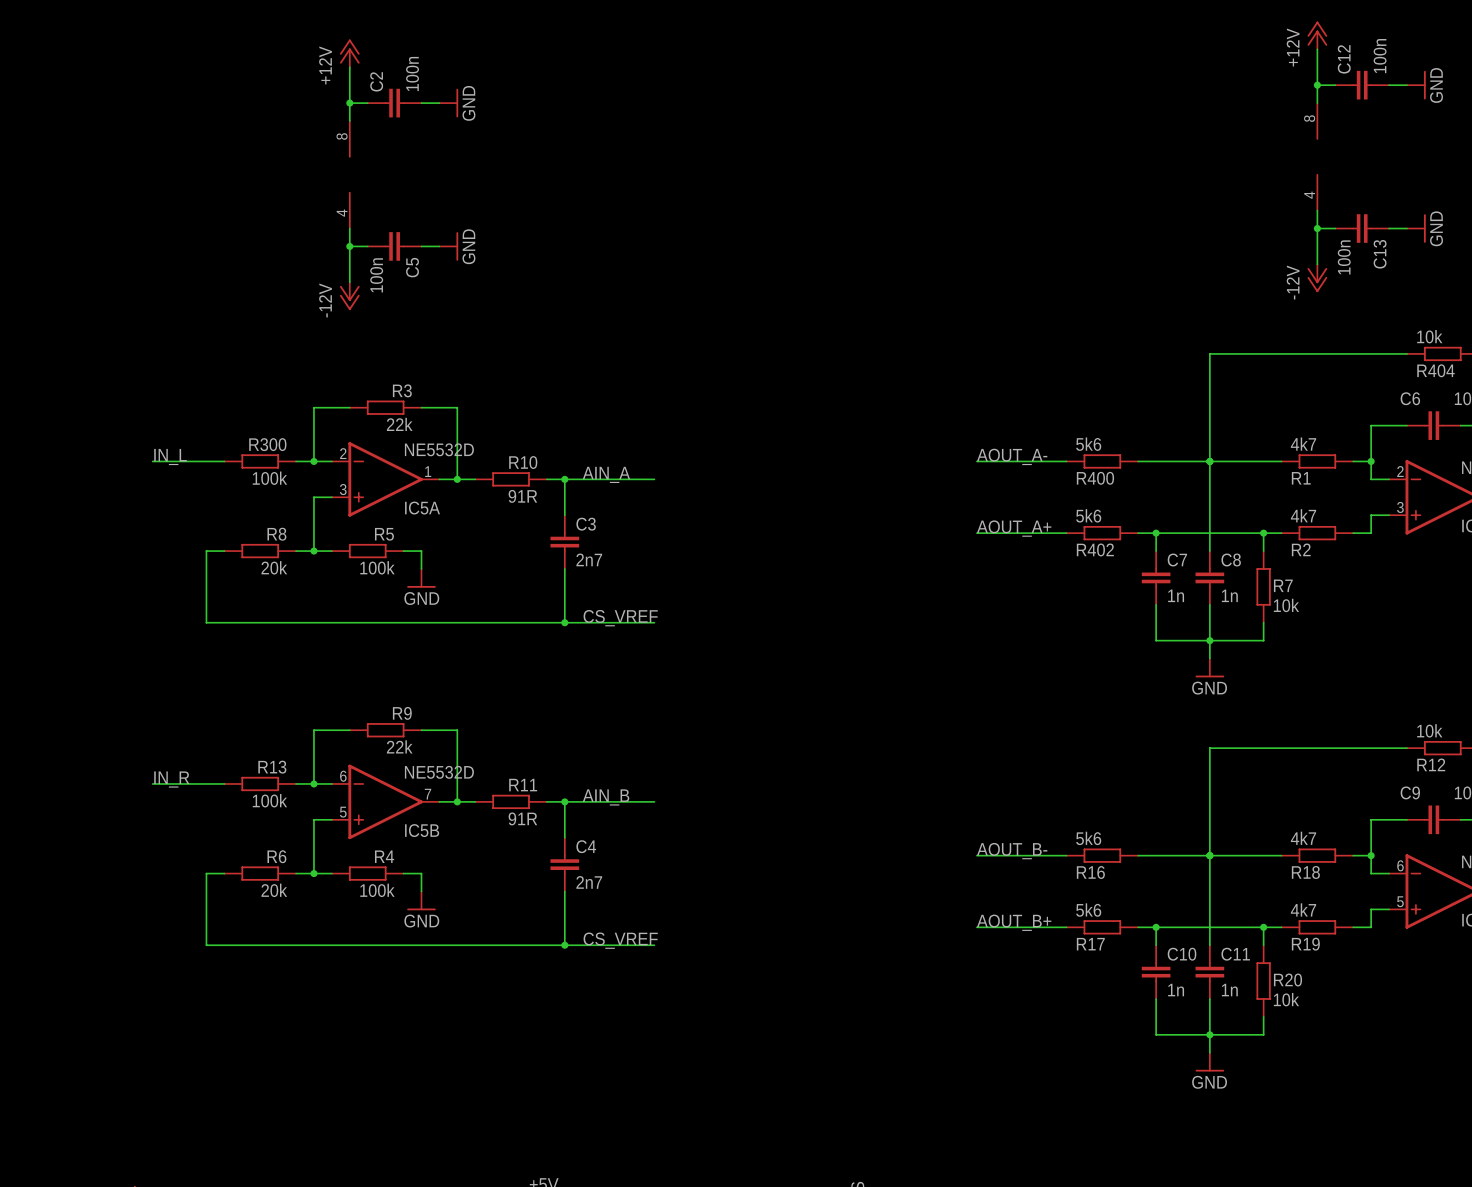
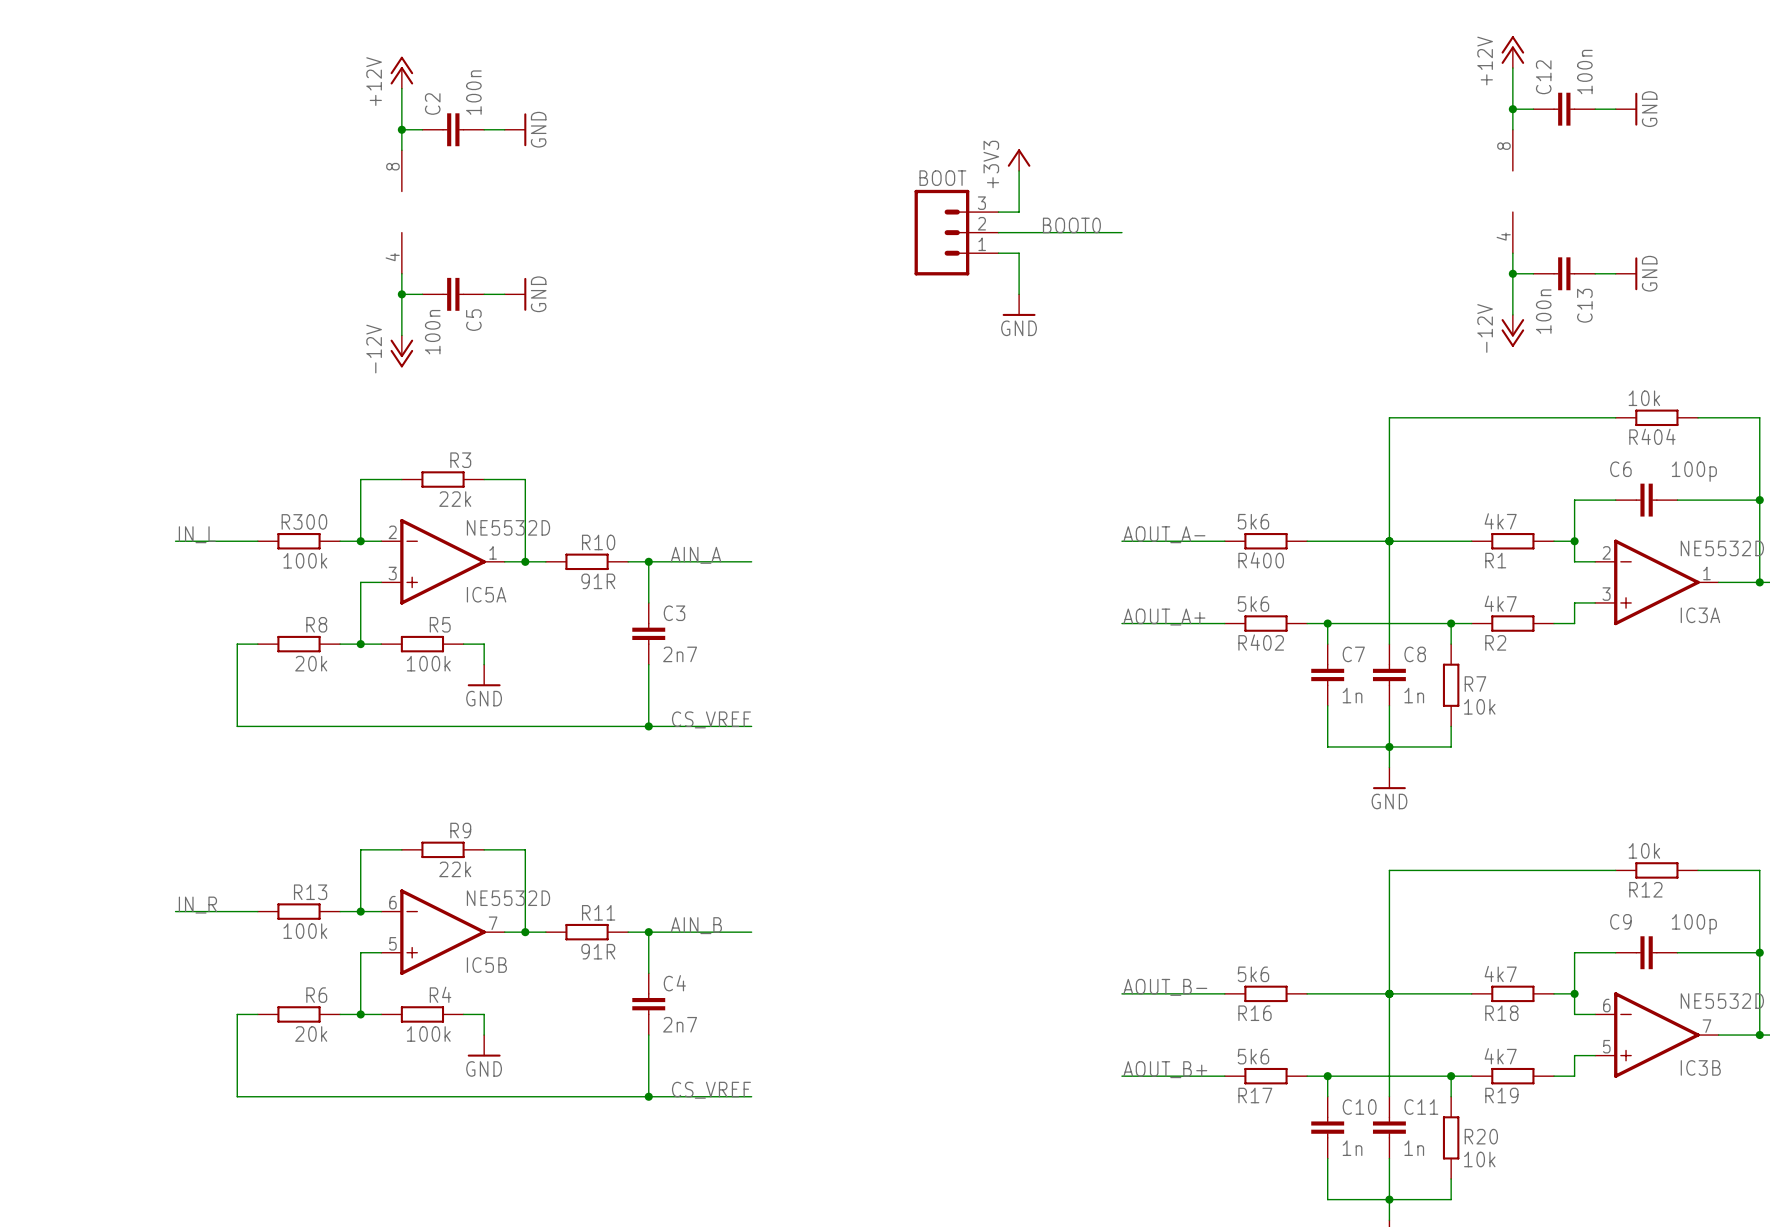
power symbol: none -> +3V3 (1019, 160)
wire: none -> (1019, 170) (1019, 212) (998, 212)
label: none -> BOOT0 (1071, 225)
BOOT: none -> (956, 232)
wire: none -> (998, 232) (1121, 232)
wire: none -> (998, 253) (1019, 253) (1019, 294)
power symbol: none -> GND (1019, 305)

